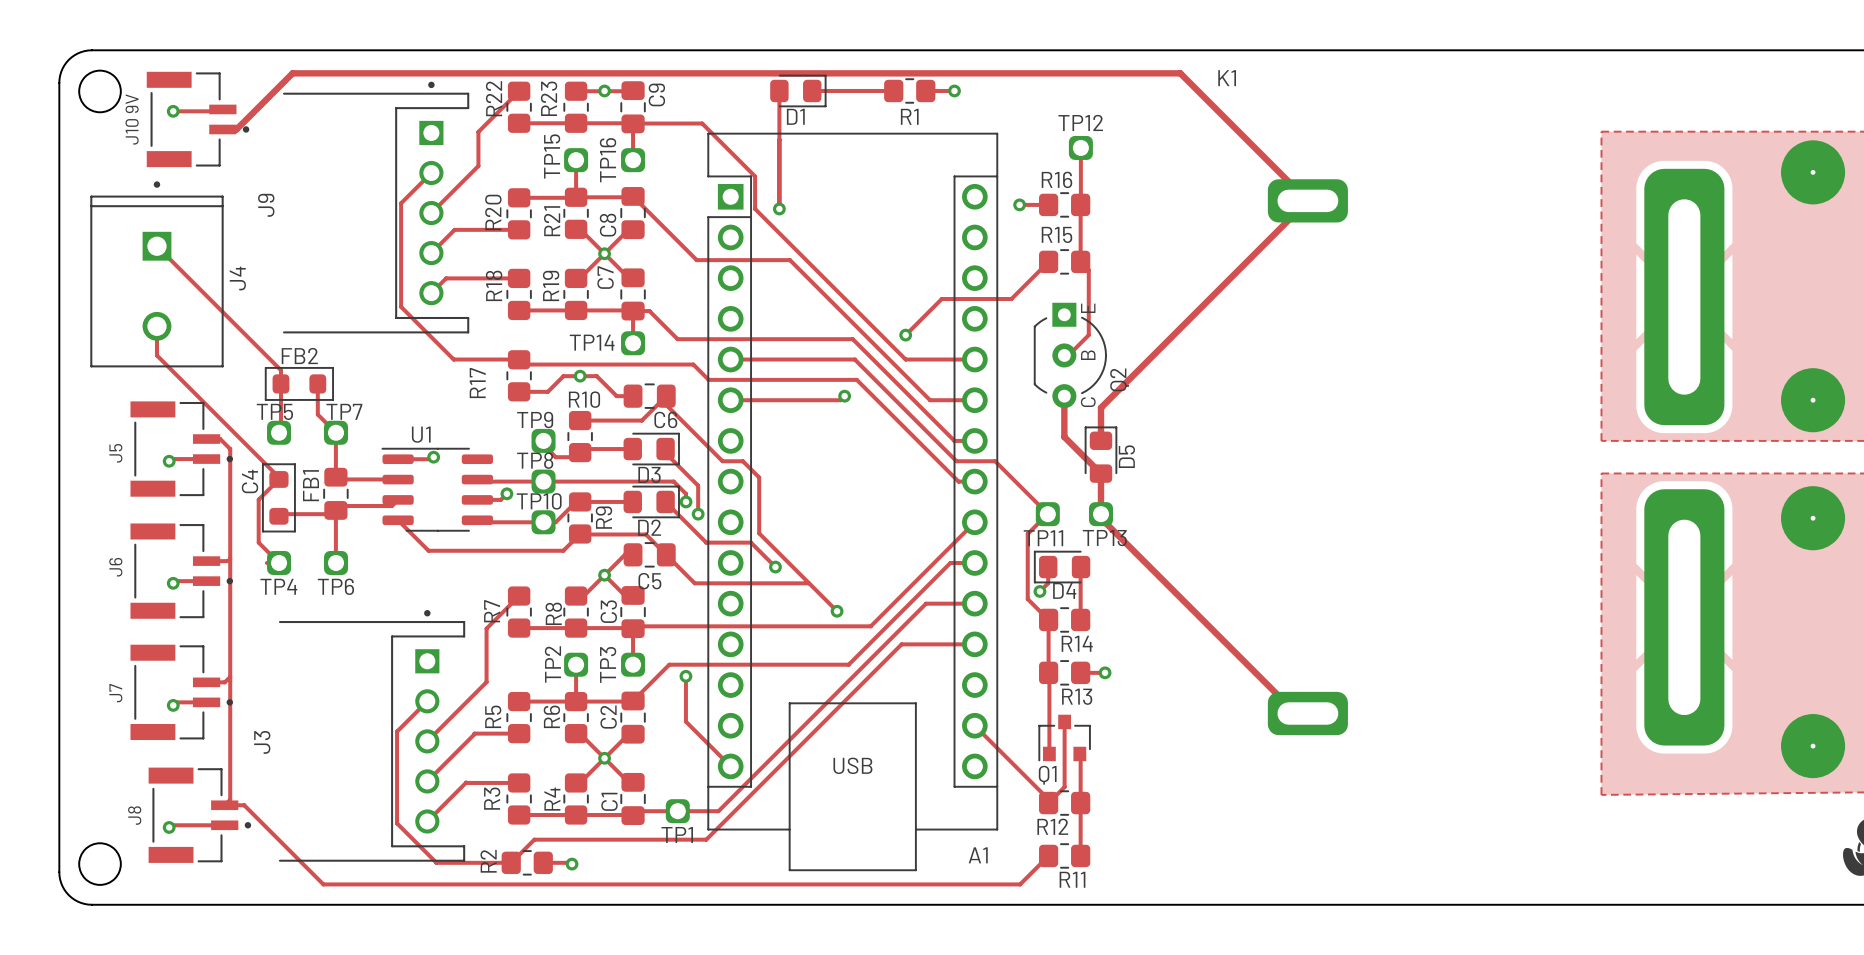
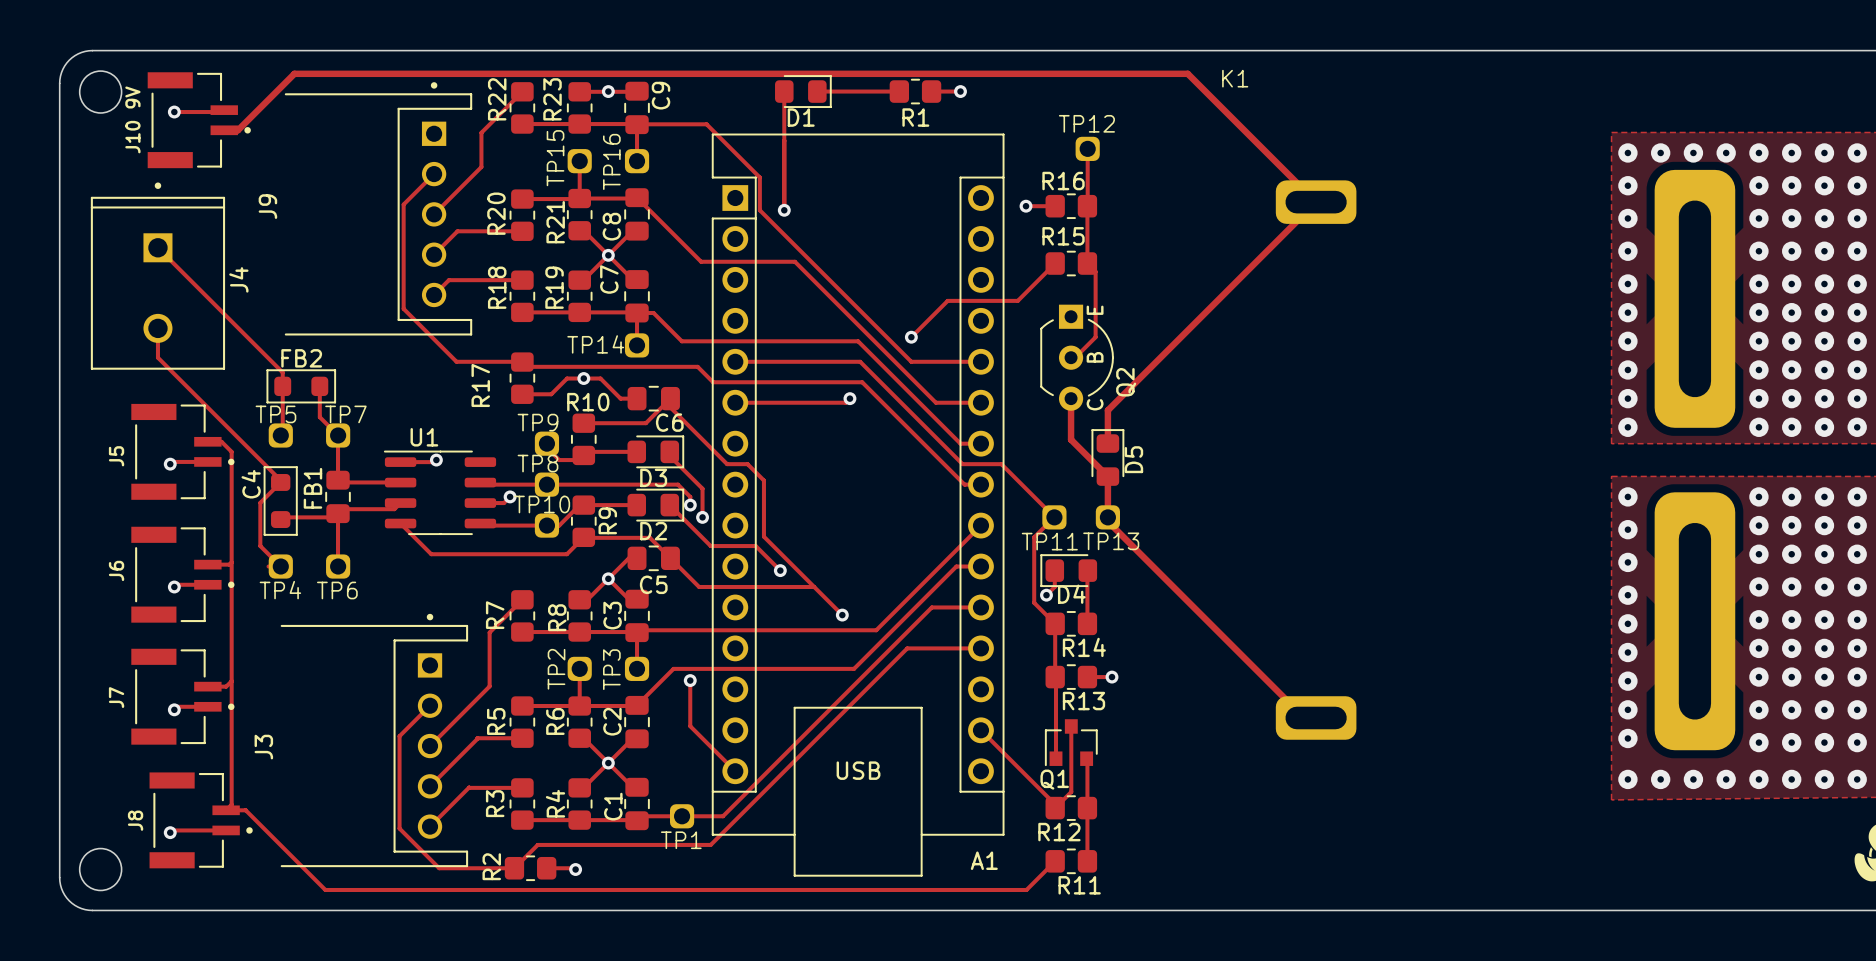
via: none -> (1627, 152)
via: none -> (1660, 152)
via: none -> (1693, 152)
via: none -> (1726, 152)
via: none -> (1758, 152)
via: none -> (1791, 152)
via: none -> (1824, 152)
via: none -> (1857, 152)
via: (1813, 172) -> none
via: none -> (1627, 185)
via: none -> (1758, 185)
via: none -> (1791, 185)
via: none -> (1824, 185)
via: none -> (1857, 185)
via: none -> (1627, 218)
via: none -> (1758, 218)
via: none -> (1791, 218)
via: none -> (1824, 218)
via: none -> (1857, 218)
via: none -> (1627, 251)
via: none -> (1758, 251)
via: none -> (1791, 251)
via: none -> (1824, 251)
via: none -> (1857, 251)
via: none -> (1627, 283)
via: none -> (1758, 283)
via: none -> (1791, 283)
via: none -> (1824, 283)
via: none -> (1857, 283)
via: none -> (1627, 312)
via: none -> (1758, 312)
via: none -> (1791, 312)
via: none -> (1824, 312)
via: none -> (1857, 312)
via: none -> (1627, 341)
via: none -> (1758, 341)
via: none -> (1791, 341)
via: none -> (1824, 341)
via: none -> (1857, 341)
via: none -> (1627, 369)
via: none -> (1758, 369)
via: none -> (1791, 369)
via: none -> (1824, 369)
via: none -> (1857, 369)
via size: [1781, 368, 1846, 433] -> [1814, 388, 1835, 409]
via: none -> (1627, 398)
via: none -> (1758, 398)
via: none -> (1791, 398)
via: none -> (1857, 398)
via: none -> (1627, 427)
via: none -> (1758, 427)
via: none -> (1791, 427)
via: none -> (1824, 427)
via: none -> (1857, 427)
via size: [1781, 486, 1846, 551] -> [1814, 515, 1835, 536]
via: none -> (1627, 496)
via: none -> (1758, 496)
via: none -> (1791, 496)
via: none -> (1824, 496)
via: none -> (1857, 496)
via: none -> (1758, 525)
via: none -> (1791, 525)
via: none -> (1857, 525)
via: none -> (1627, 529)
via: none -> (1758, 554)
via: none -> (1791, 554)
via: none -> (1824, 554)
via: none -> (1857, 554)
via: none -> (1627, 562)
via: none -> (1758, 586)
via: none -> (1791, 586)
via: none -> (1824, 586)
via: none -> (1857, 586)
via: none -> (1627, 595)
via: none -> (1758, 619)
via: none -> (1791, 619)
via: none -> (1824, 619)
via: none -> (1857, 619)
via: none -> (1627, 623)
via: none -> (1758, 648)
via: none -> (1791, 648)
via: none -> (1824, 648)
via: none -> (1857, 648)
via: none -> (1627, 652)
via: none -> (1758, 677)
via: none -> (1791, 677)
via: none -> (1824, 677)
via: none -> (1857, 677)
via: none -> (1627, 681)
via: none -> (1627, 709)
via: none -> (1758, 709)
via: none -> (1791, 709)
via: none -> (1824, 709)
via: none -> (1857, 709)
via size: [1781, 714, 1846, 779] -> [1814, 732, 1835, 753]
via: none -> (1627, 738)
via: none -> (1758, 742)
via: none -> (1791, 742)
via: none -> (1857, 742)
via: none -> (1627, 779)
via: none -> (1660, 779)
via: none -> (1693, 779)
via: none -> (1726, 779)
via: none -> (1758, 779)
via: none -> (1791, 779)
via: none -> (1824, 779)
via: none -> (1857, 779)

